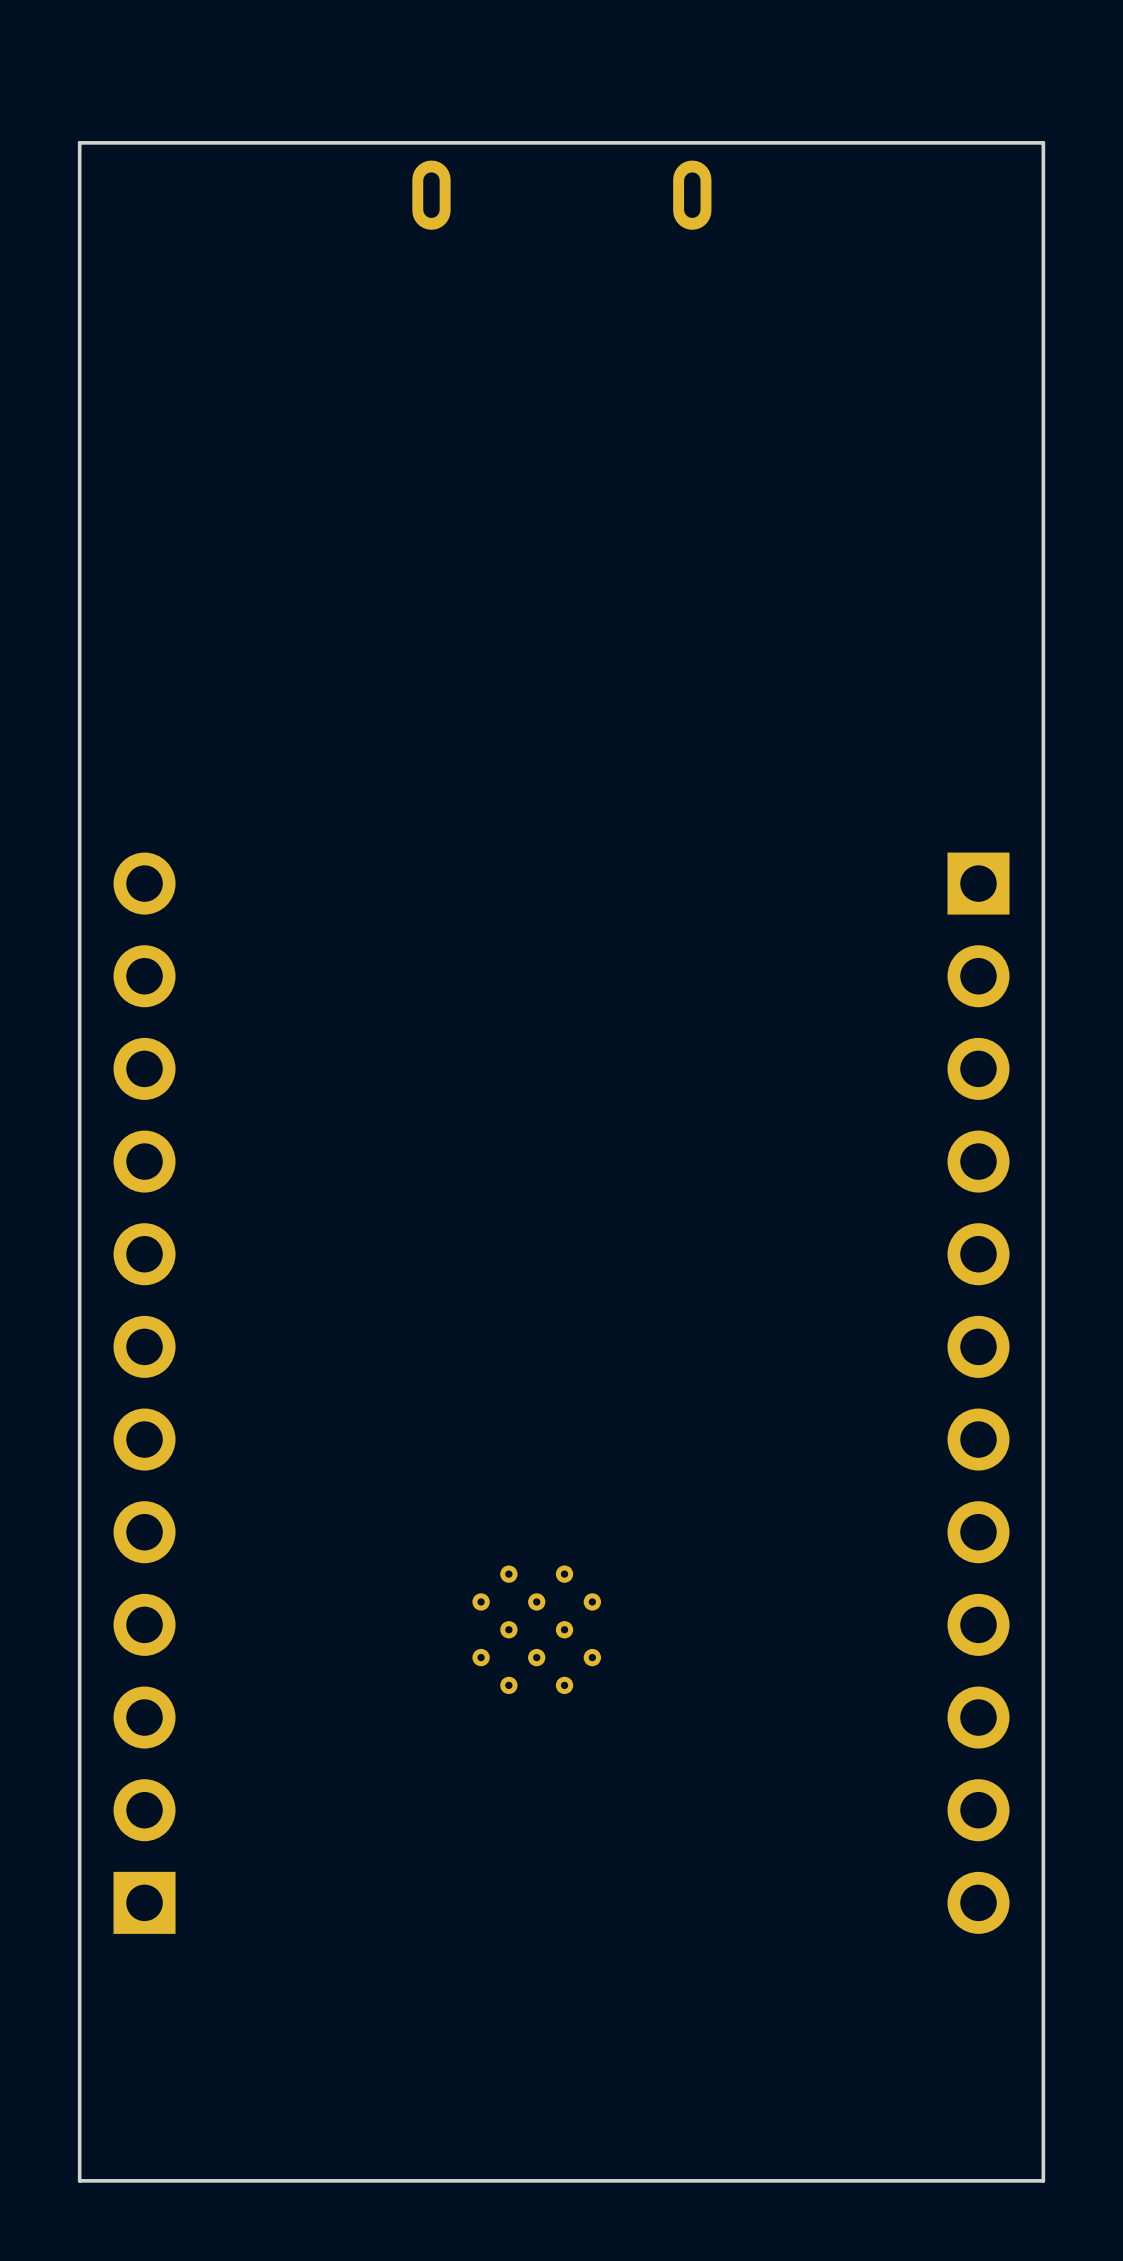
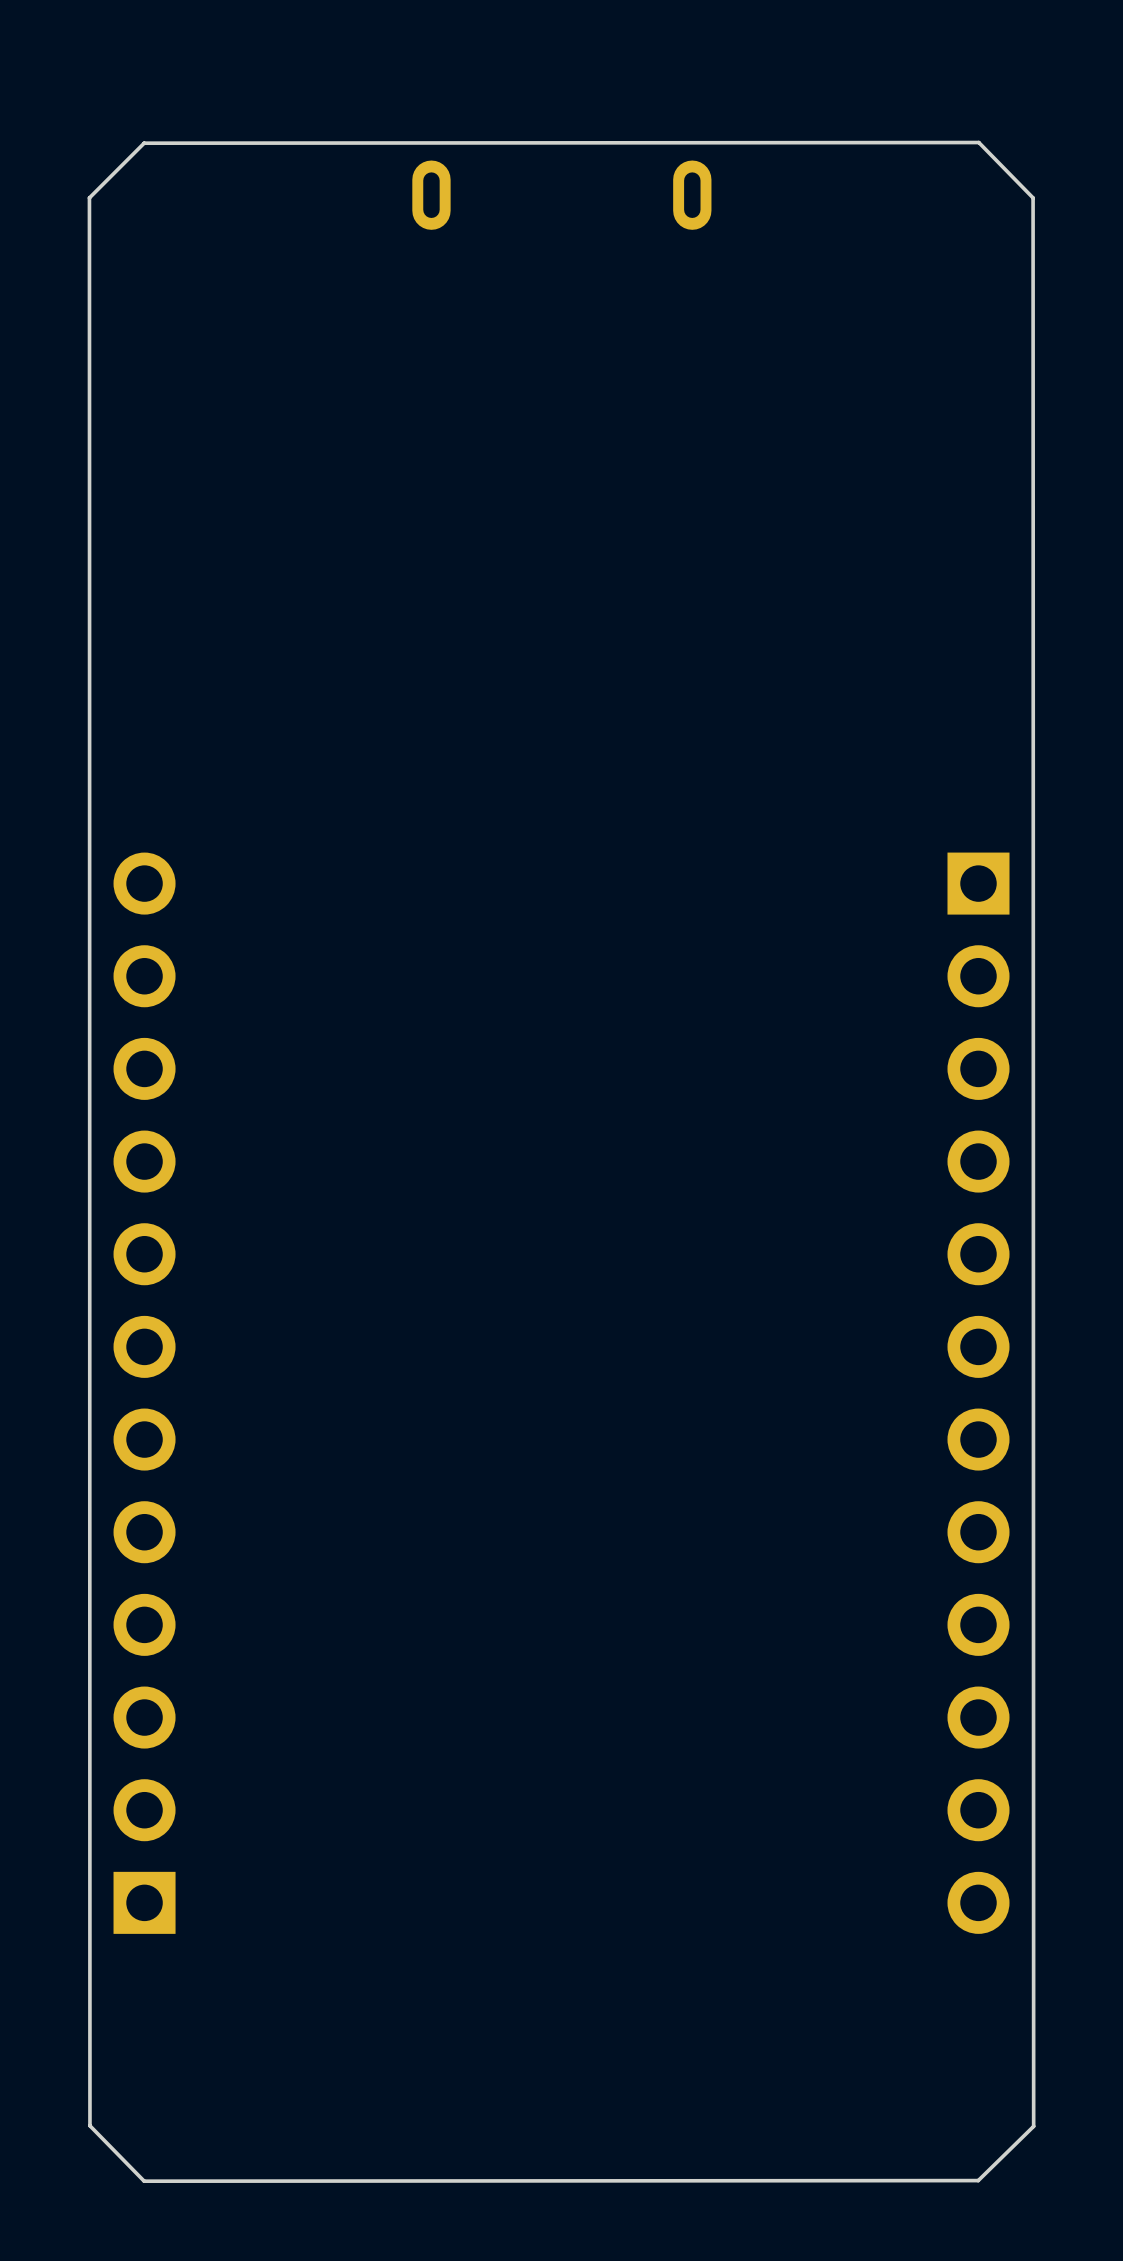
board edge: (1043, 142) (1043, 2180) (79, 2180) (79, 142) (1043, 142) -> (978, 142) (1033, 197) (1033, 2126) (978, 2180) (144, 2181) (89, 2125) (89, 197) (144, 143) (978, 142)
part: (536, 1629) -> none

